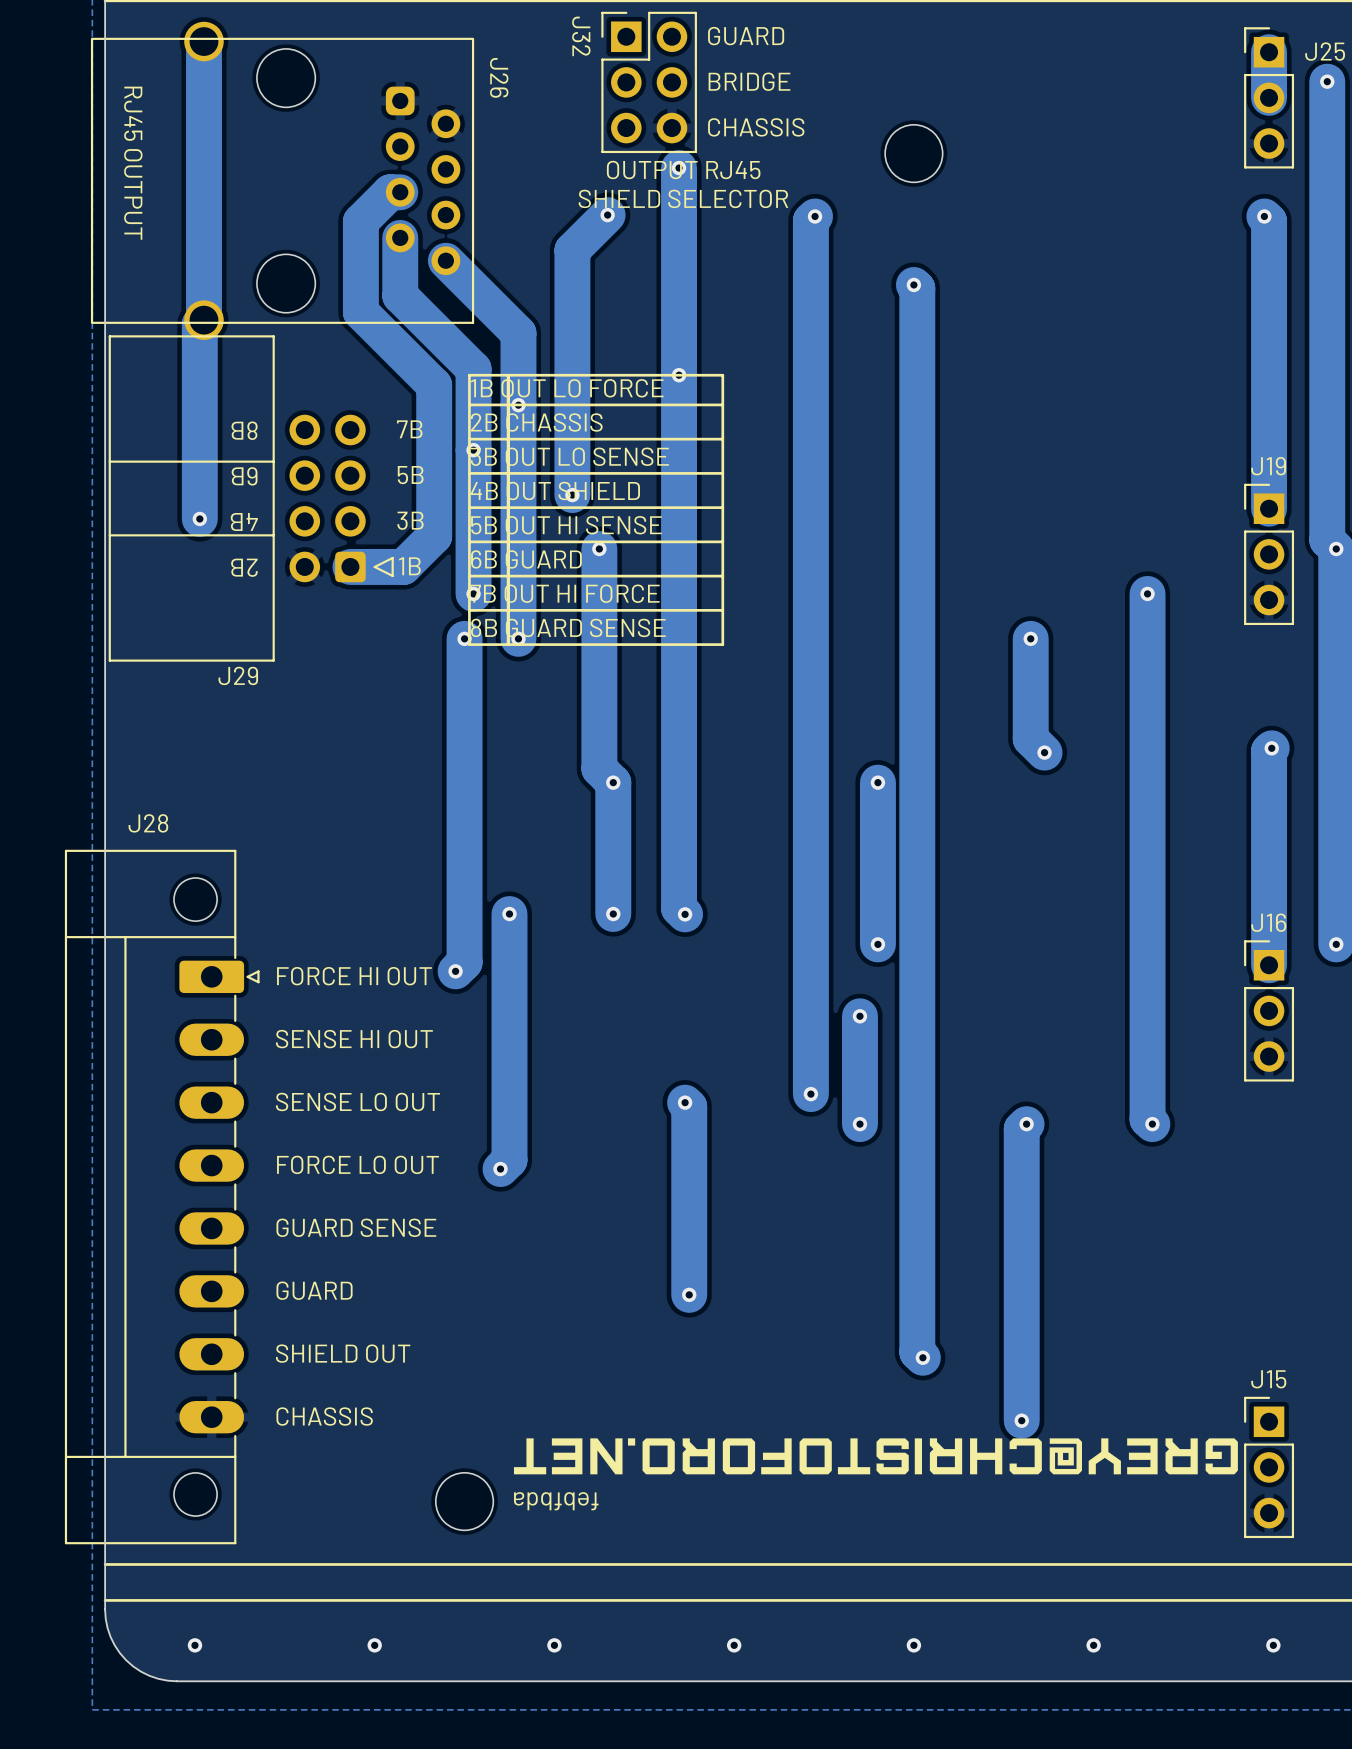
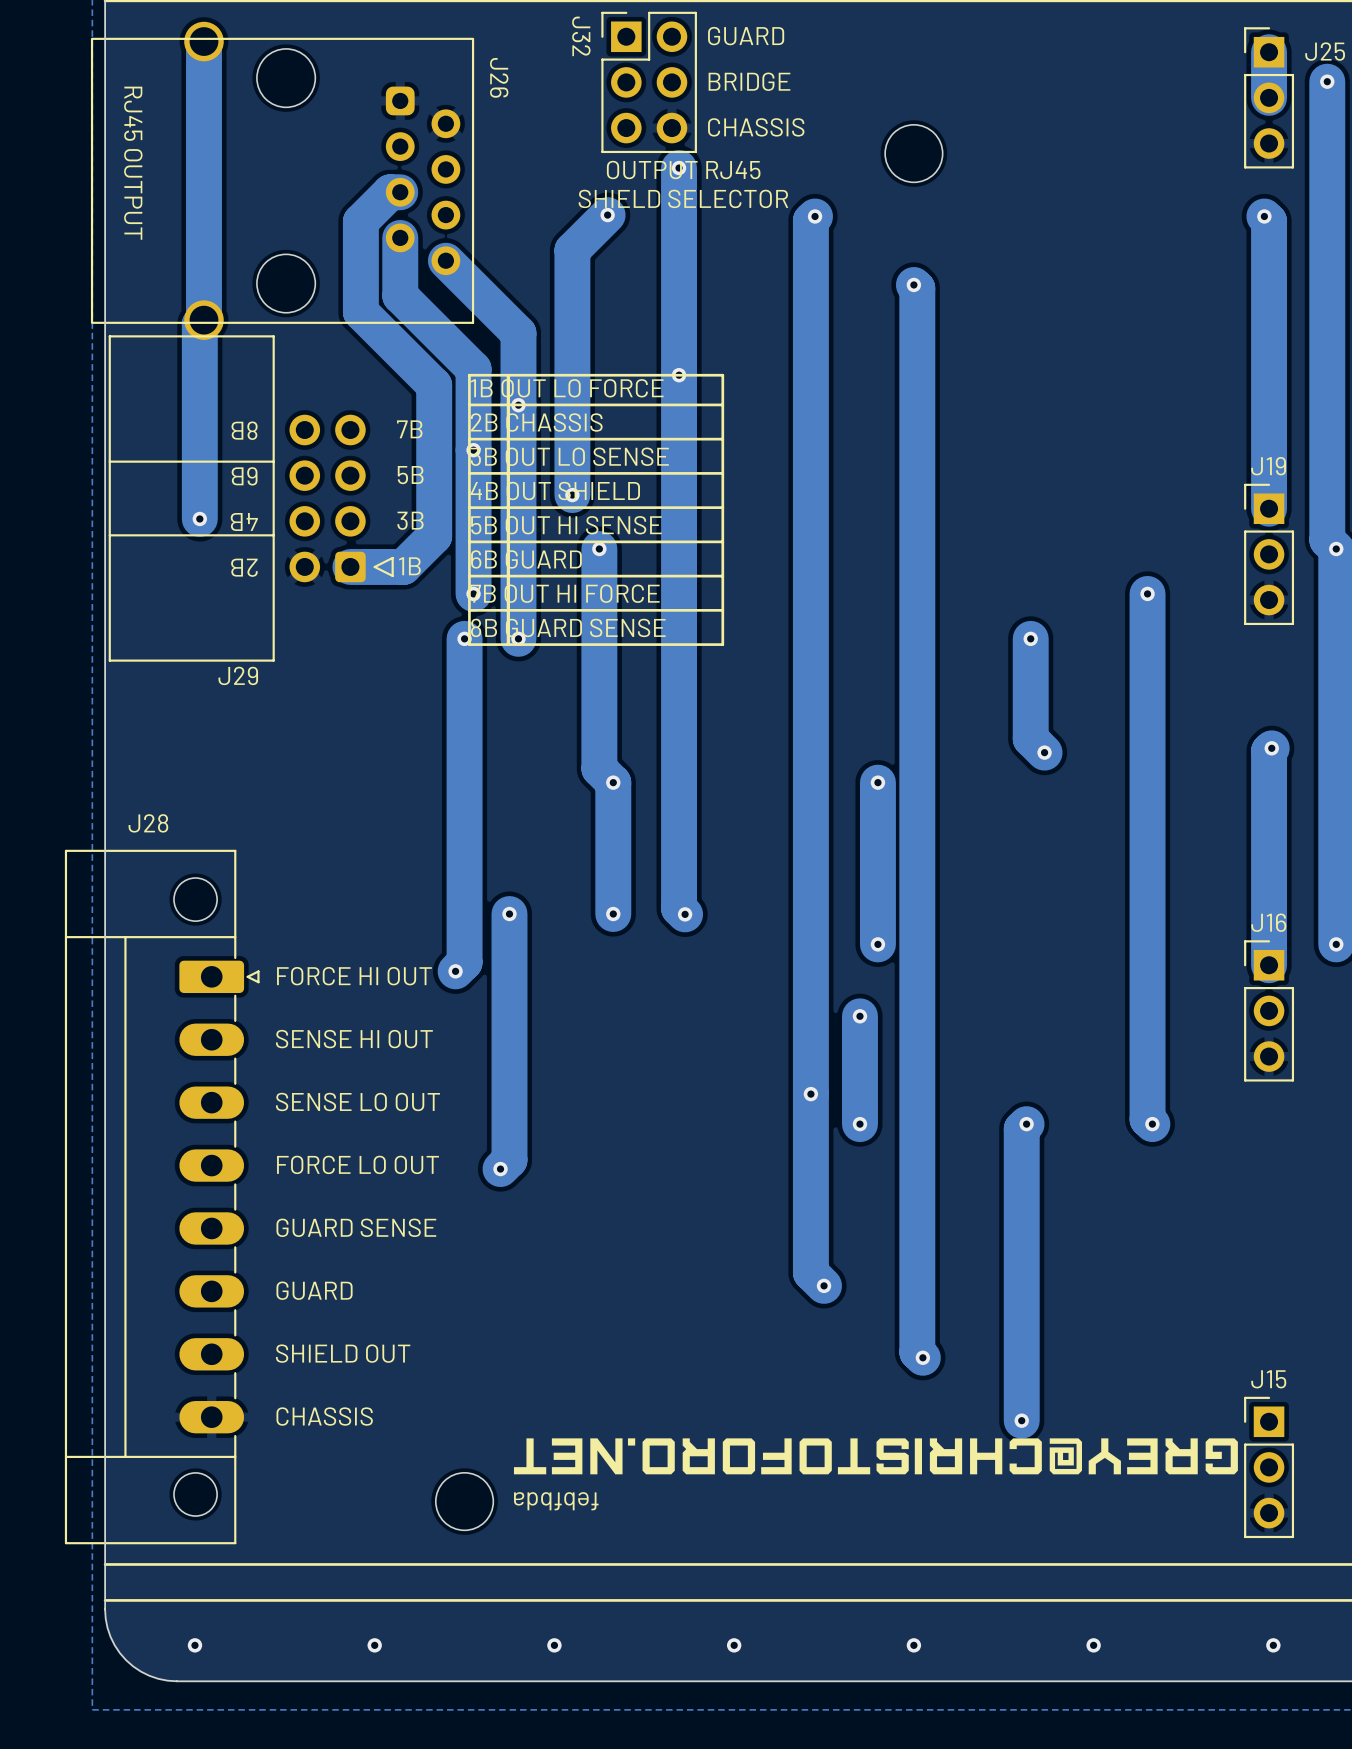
track: none -> (810, 1094) (810, 1272) (824, 1285)
track: (685, 1102) (689, 1106) (689, 1294) -> none
via: (685, 1102) -> none
via: none -> (824, 1285)
via: (689, 1294) -> none

